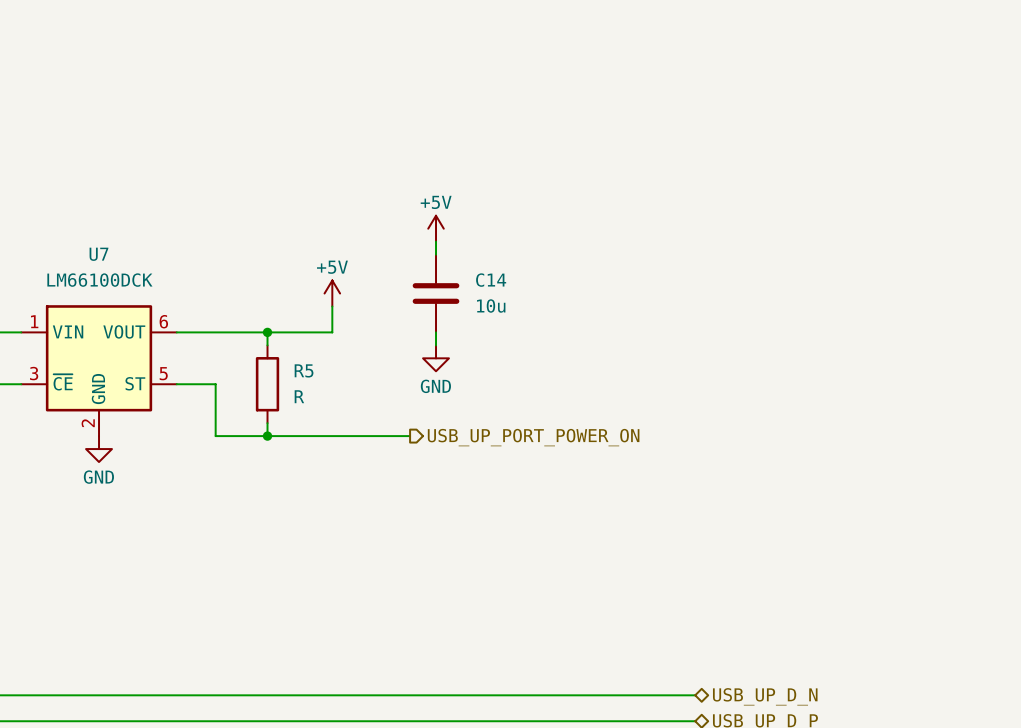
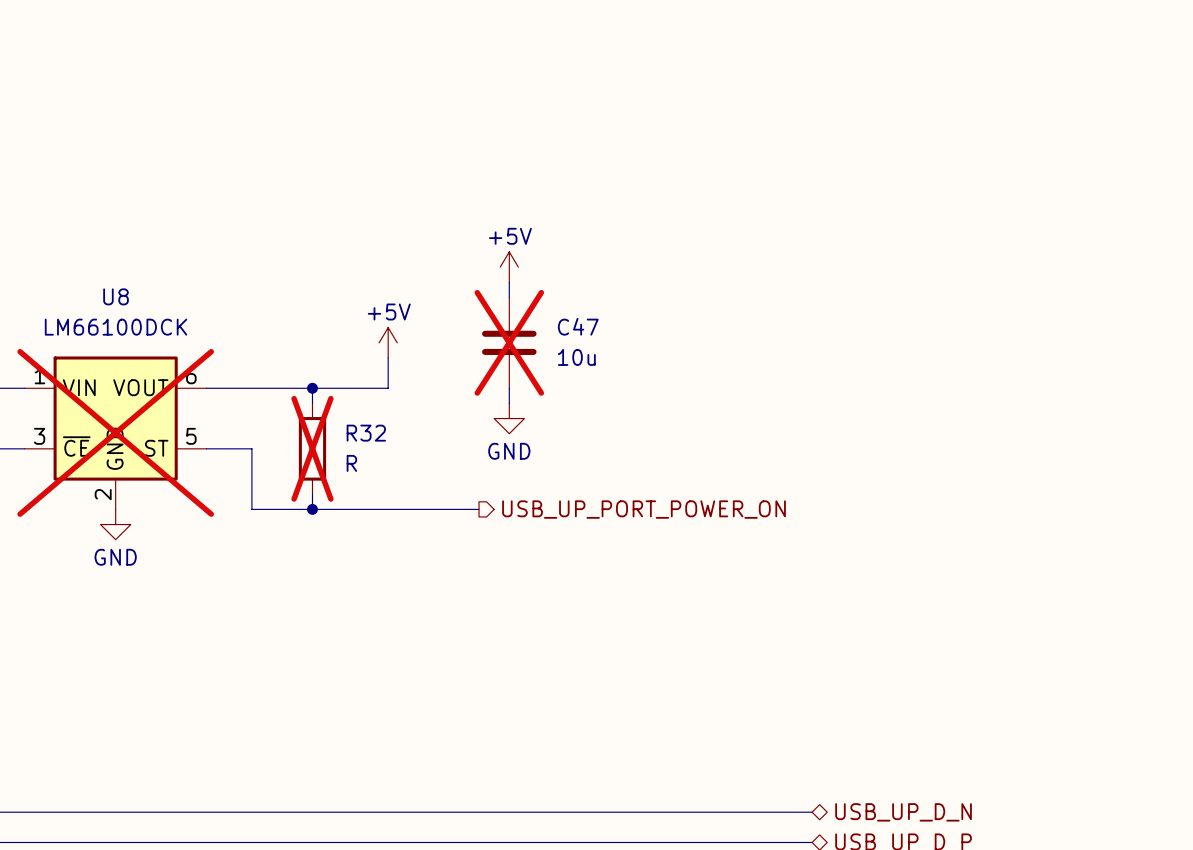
U7 name: U7 (98, 254) -> U8 (116, 296)
C14 name: C14 (491, 280) -> C47 (578, 326)
C14 do-not-place cross: none -> (509, 342)
U7 do-not-place cross: none -> (115, 432)
R5 name: R5 (304, 370) -> R32 (366, 433)
R5 do-not-place cross: none -> (312, 448)

